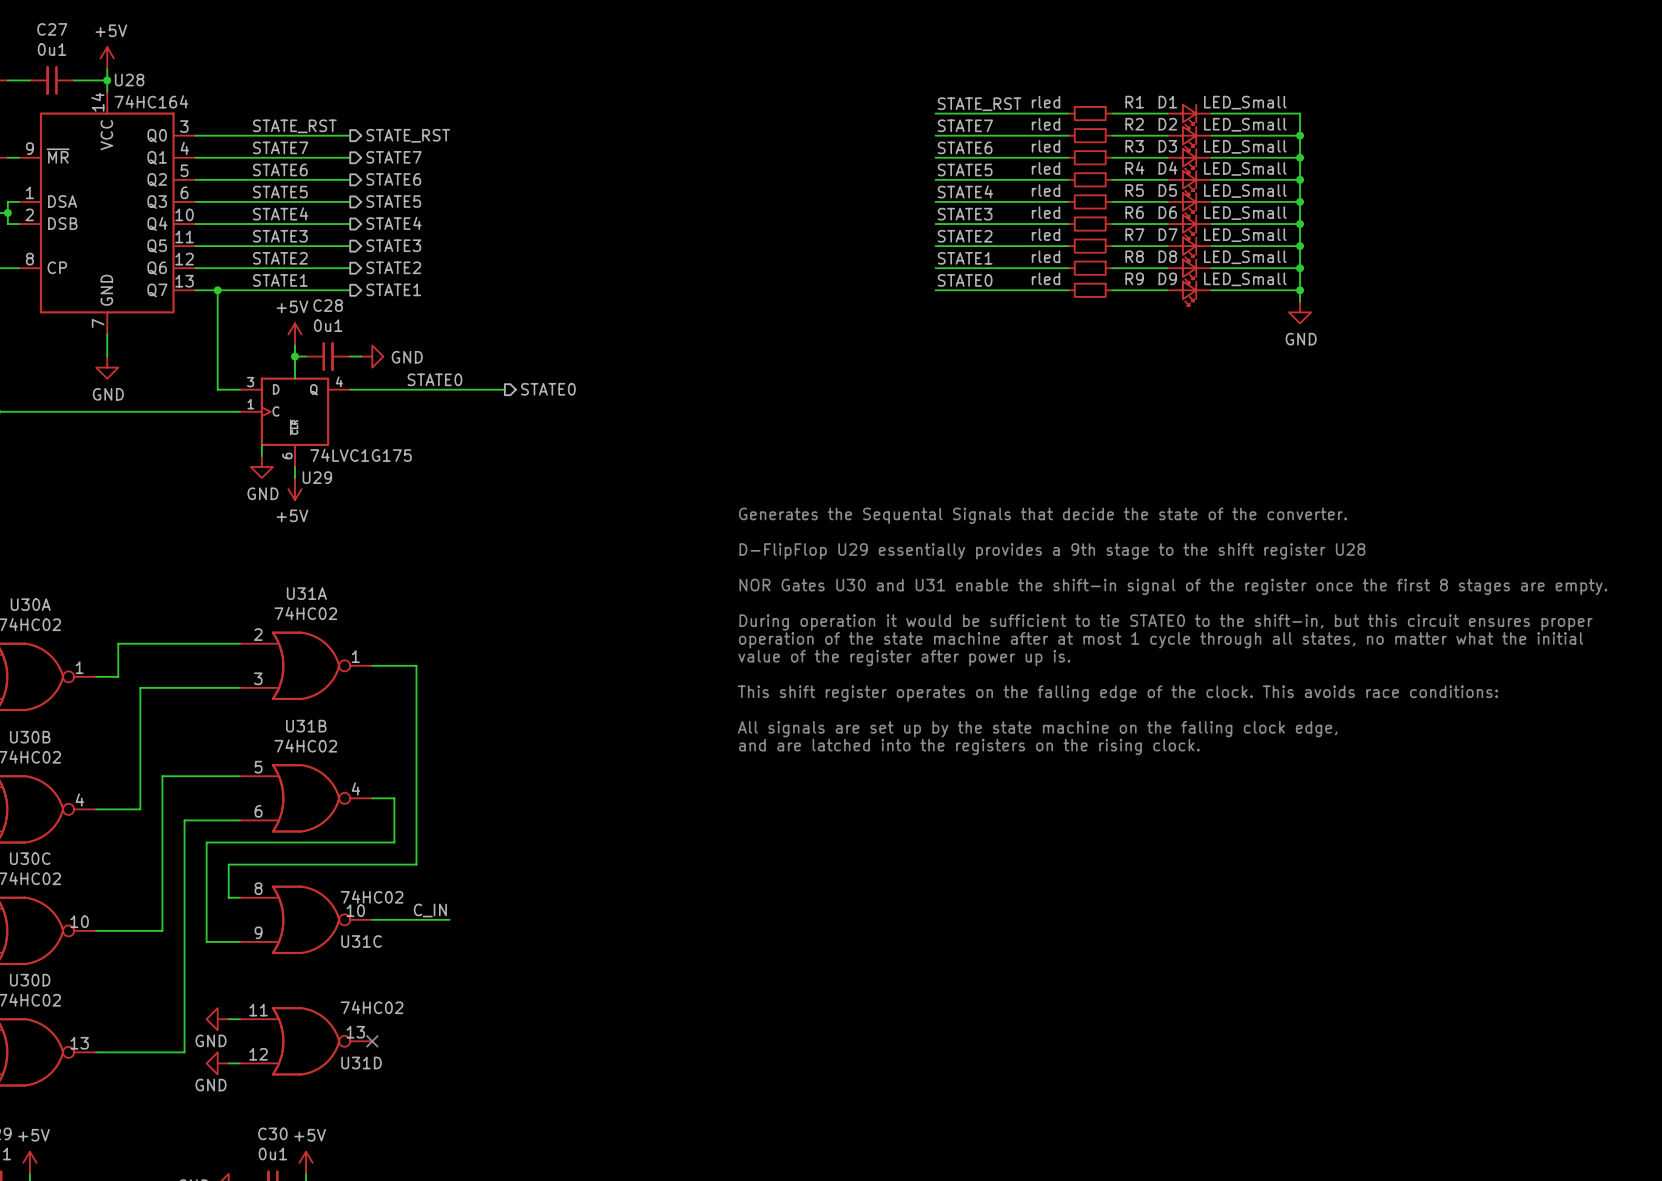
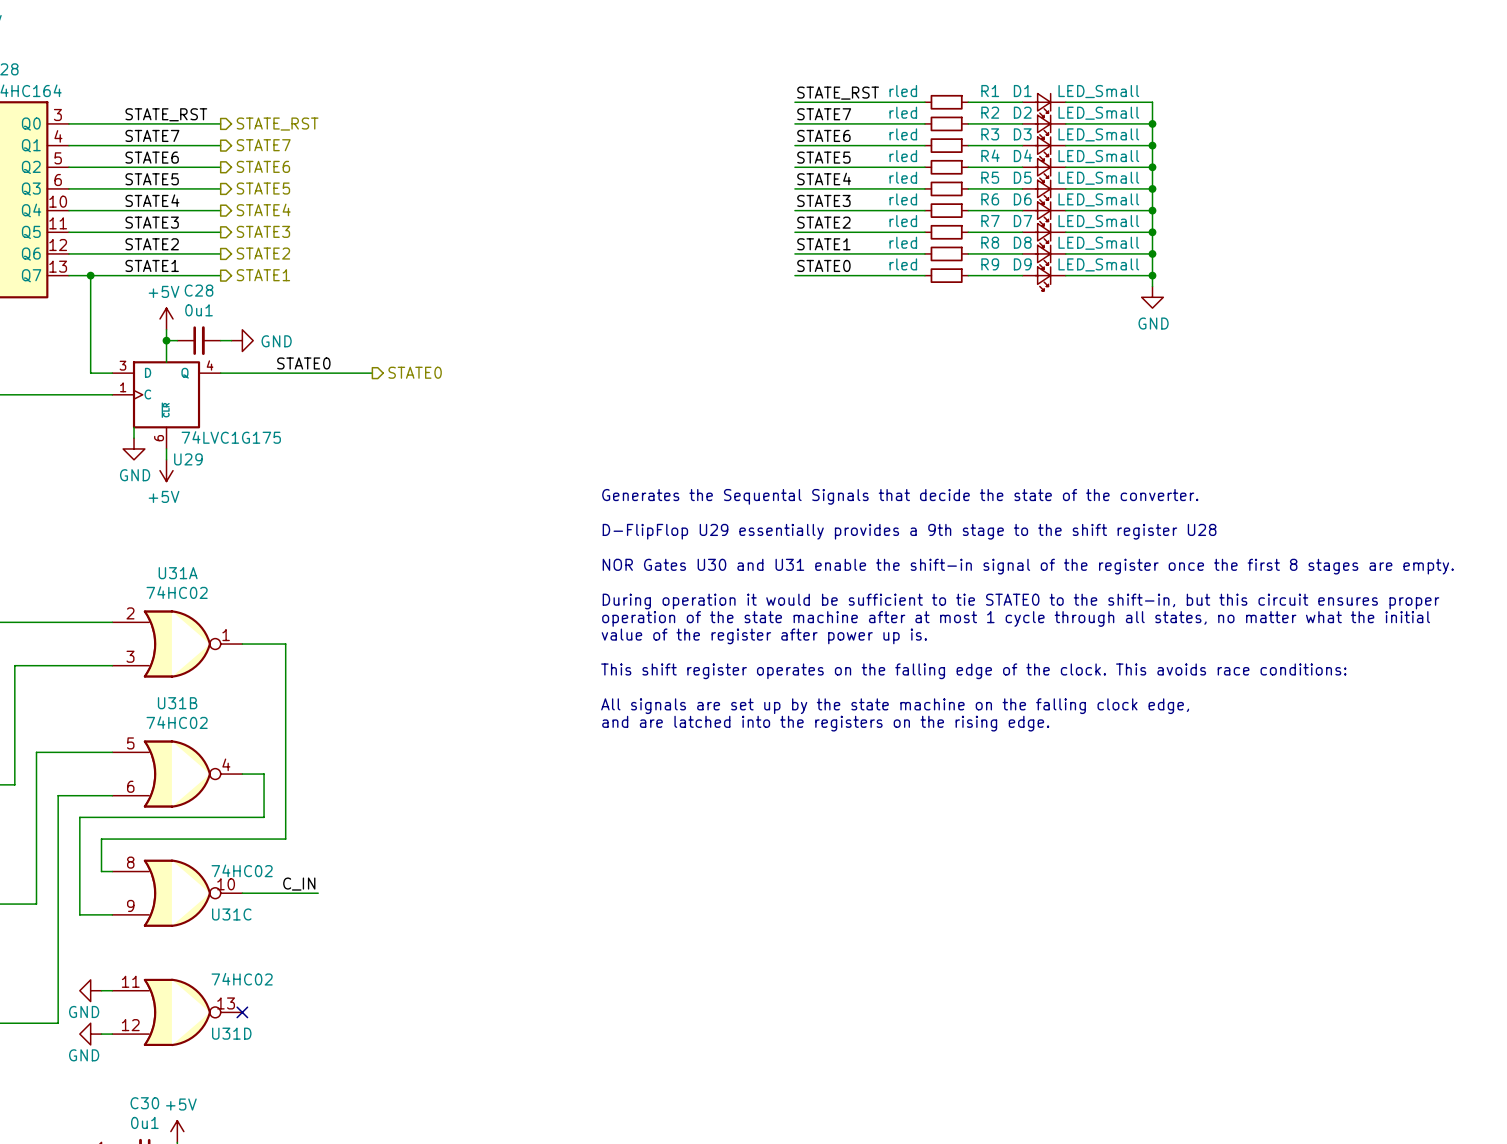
text: and are latched into the registers on the rising clock. (969, 746) -> and are latched into the registers on the rising edge. (825, 723)

